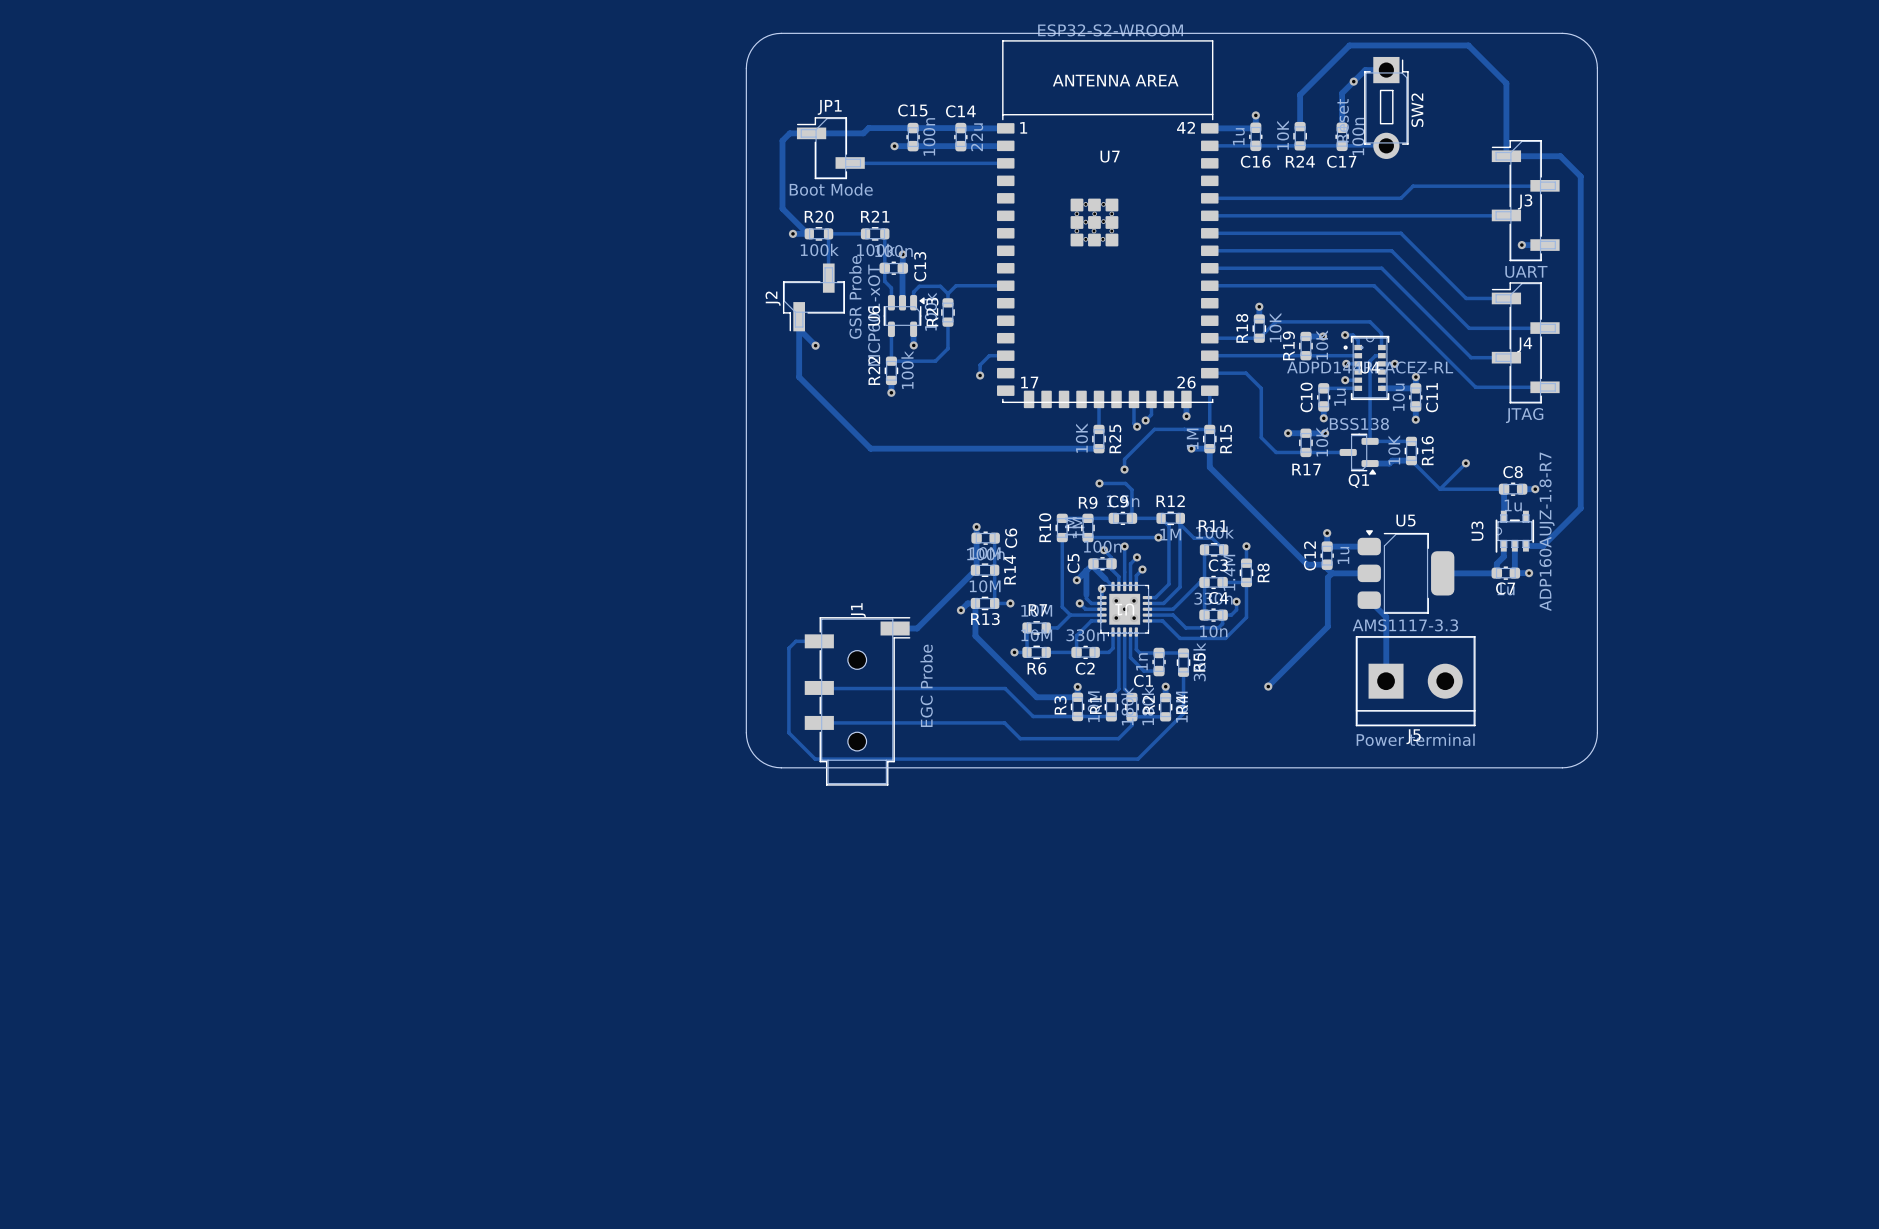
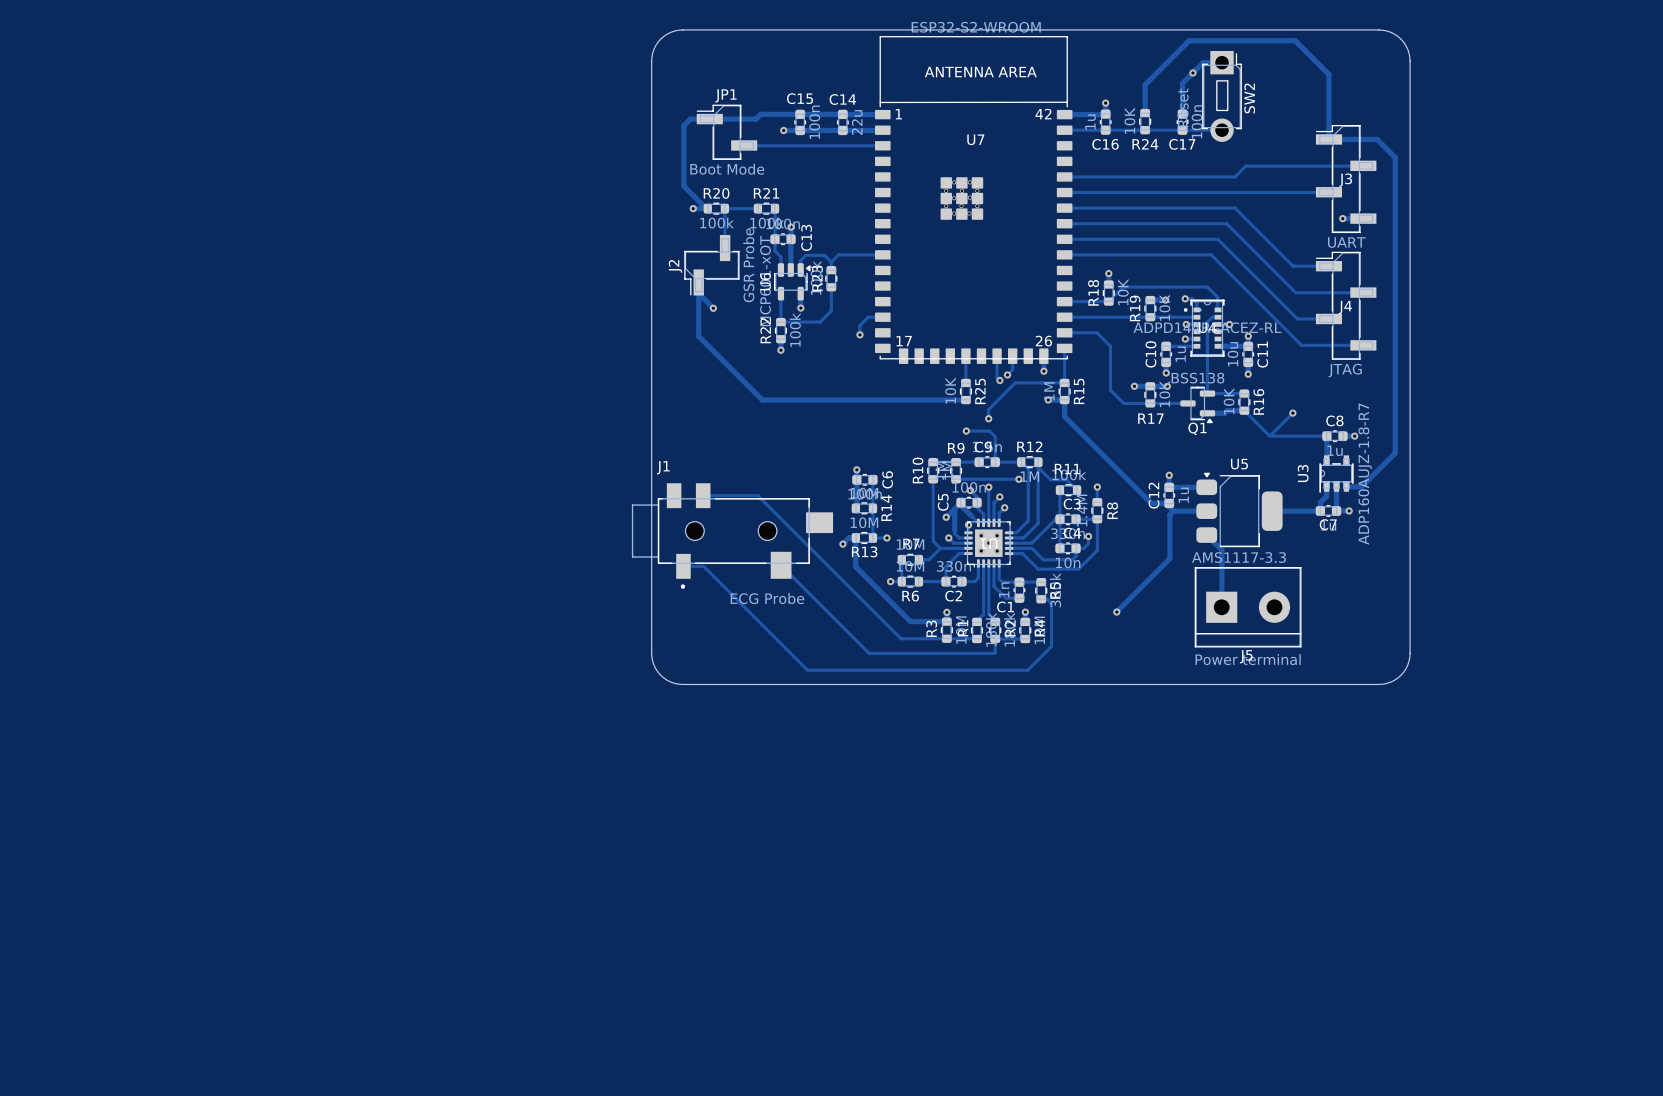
track: (975, 570) (917, 628) (895, 628) -> none
J1 name position: J1 (858, 610) -> J1 (663, 467)
J1 footprint: [804, 617, 911, 786] -> [631, 483, 834, 589]
track: (819, 641) (795, 641) (788, 648) (788, 732) (815, 759) (1138, 759) (1183, 713) (1183, 672) -> (683, 566) (703, 566) (807, 670) (1027, 670) (1051, 646) (1051, 603) (1047, 599) (1041, 599)
J1 value: EGC Probe (926, 685) -> ECG Probe (767, 598)
track: (819, 687) (1005, 688) (1033, 716) -> (703, 495) (757, 495) (901, 638) (907, 638)
track: (819, 722) (1004, 722) (1020, 738) (1118, 738) (1131, 725) -> (781, 565) (869, 653) (994, 653) (995, 646)

